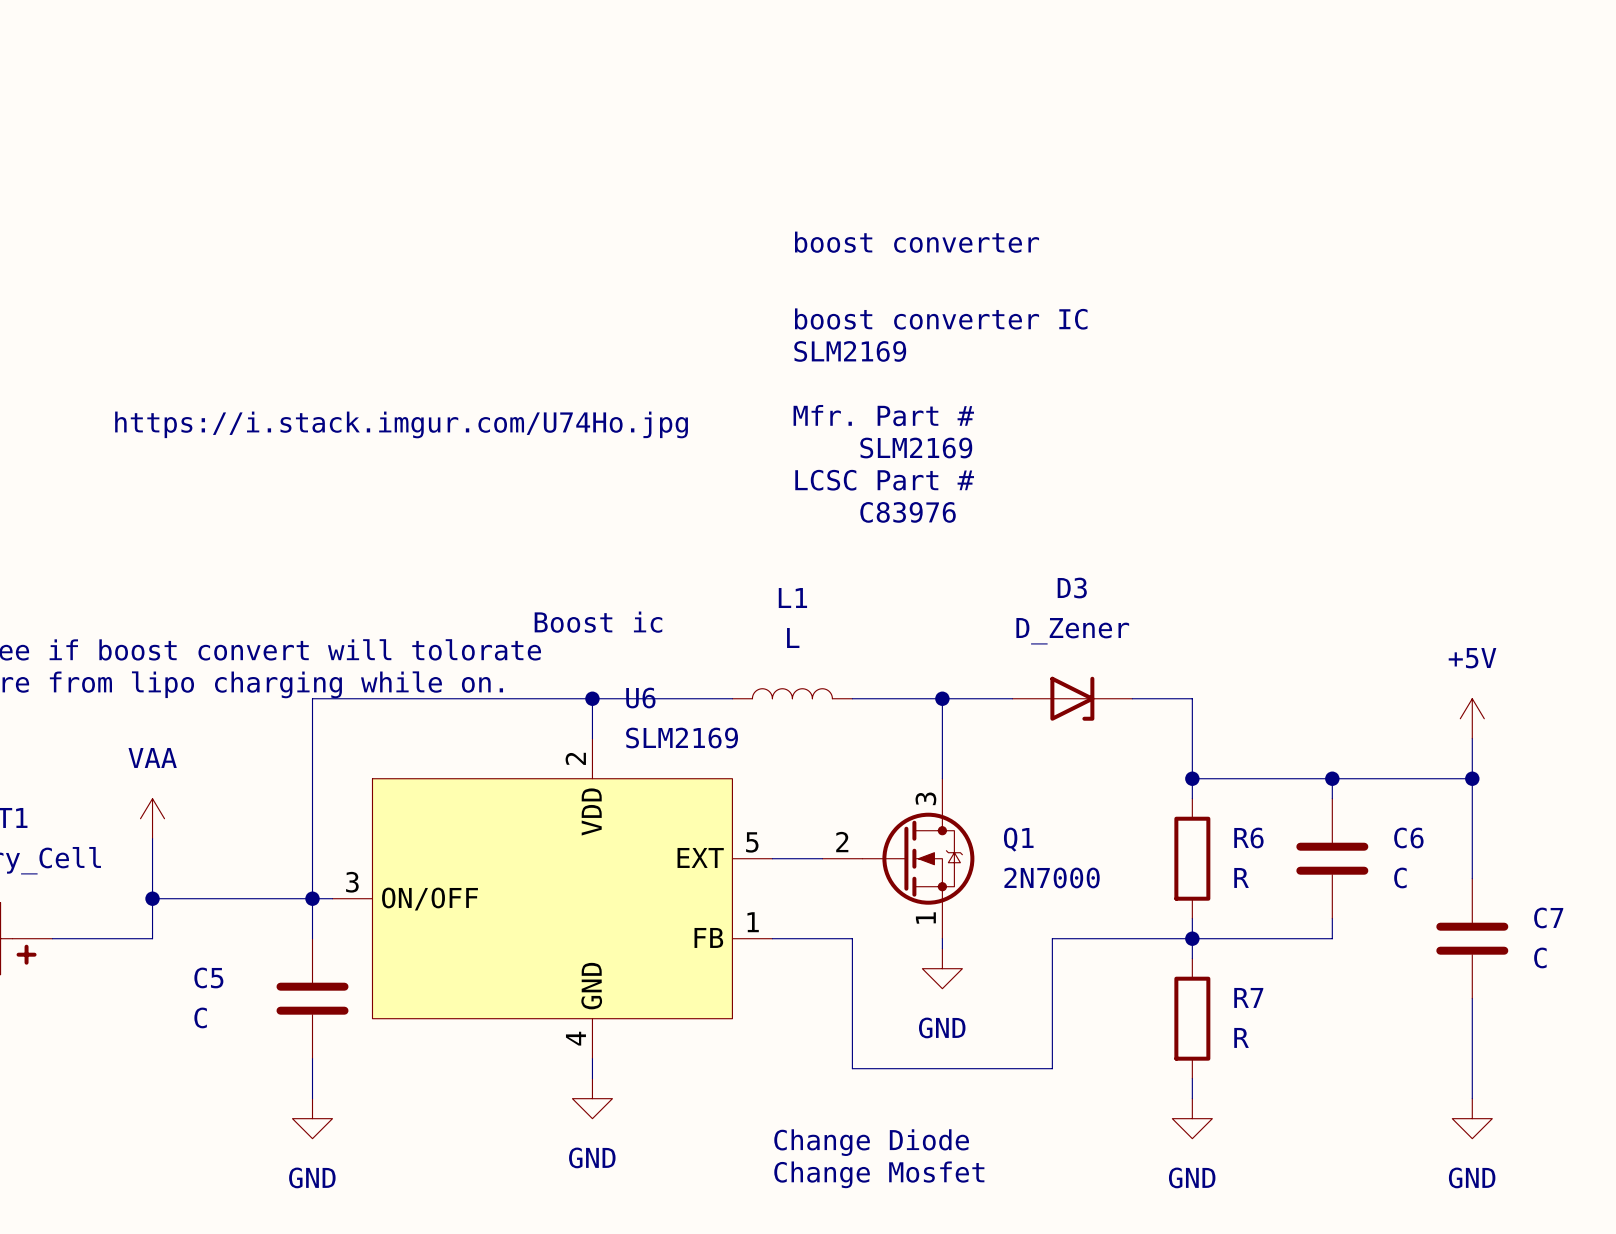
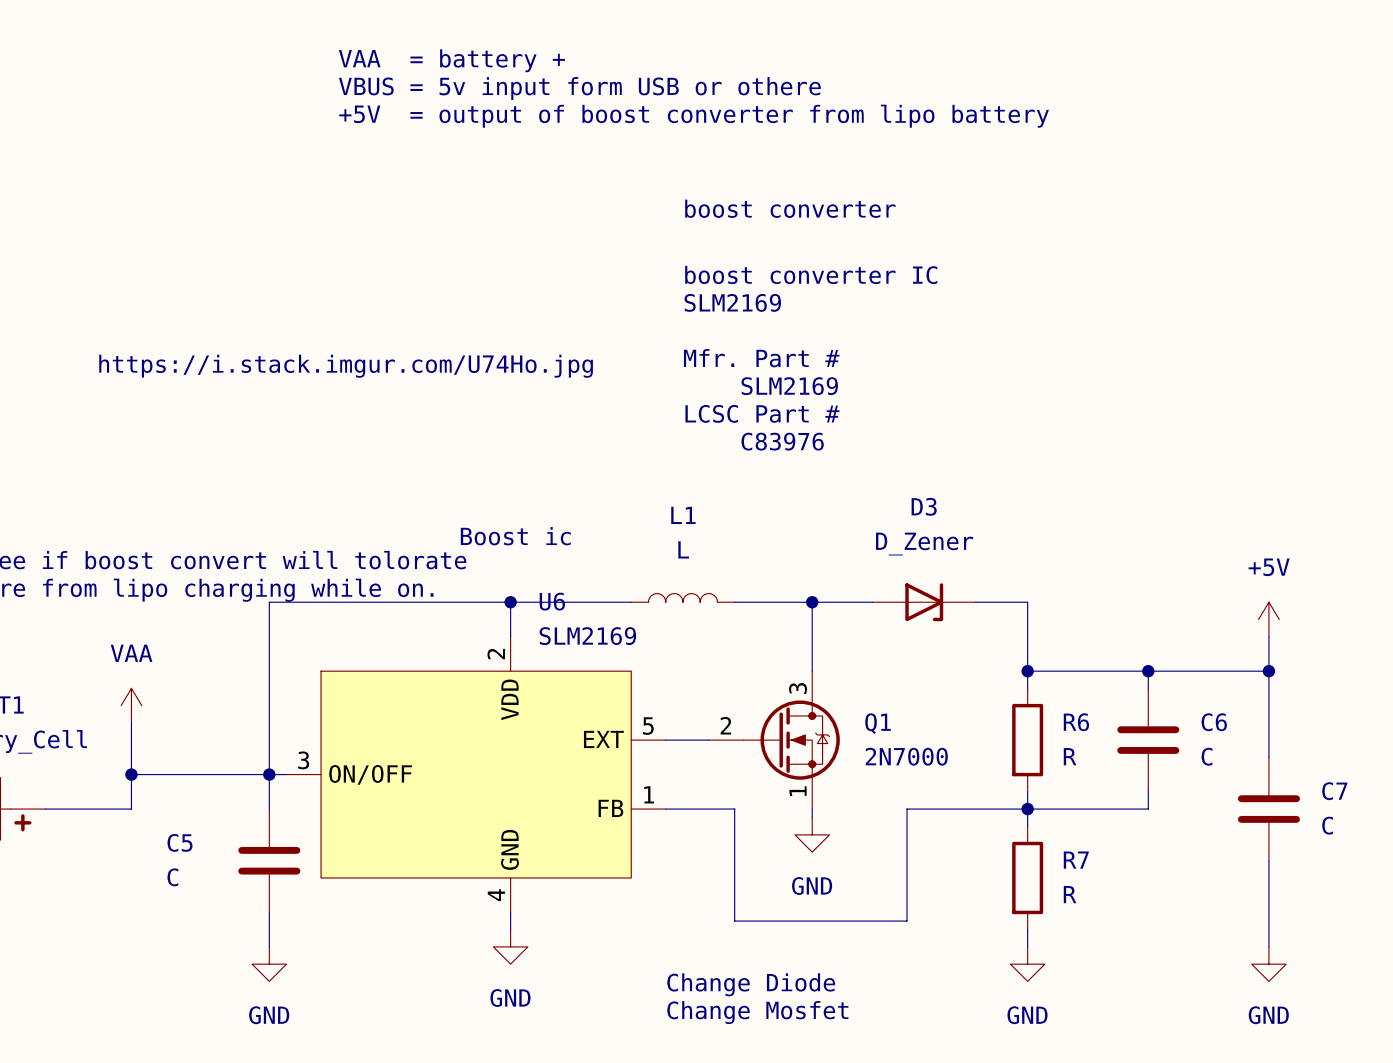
text: none -> VAA = battery + (451, 60)
text: none -> VBUS = 5v input form USB or othere (579, 88)
text: none -> +5V = output of boost converter from lipo battery (694, 116)

